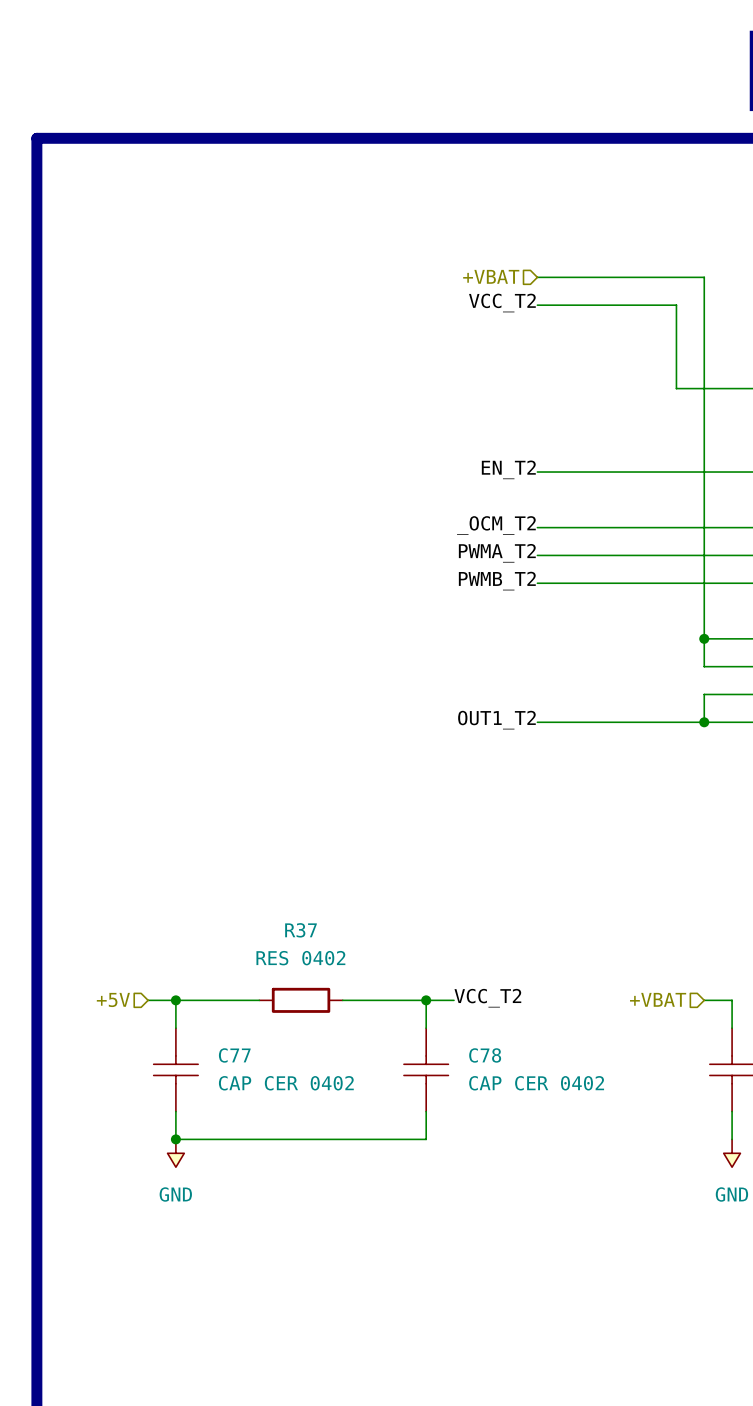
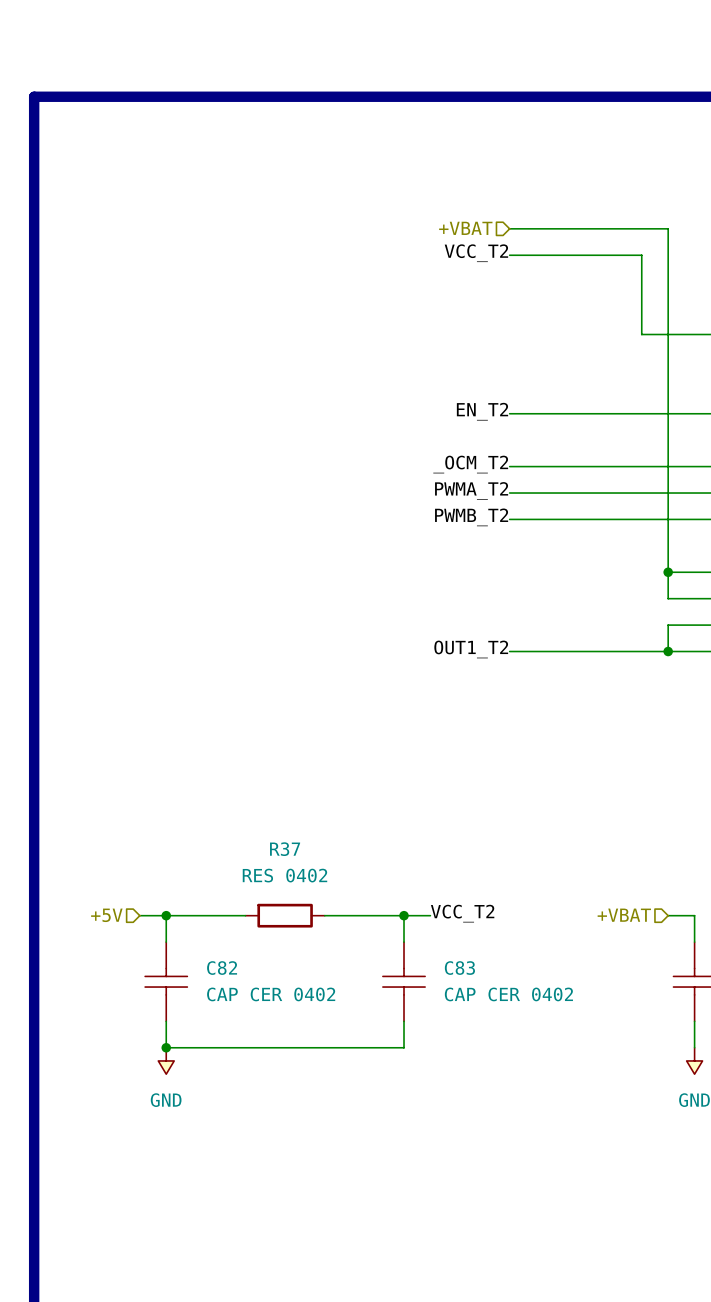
C77 name: C77 (234, 1055) -> C82 (222, 968)
C78 name: C78 (485, 1055) -> C83 (459, 968)

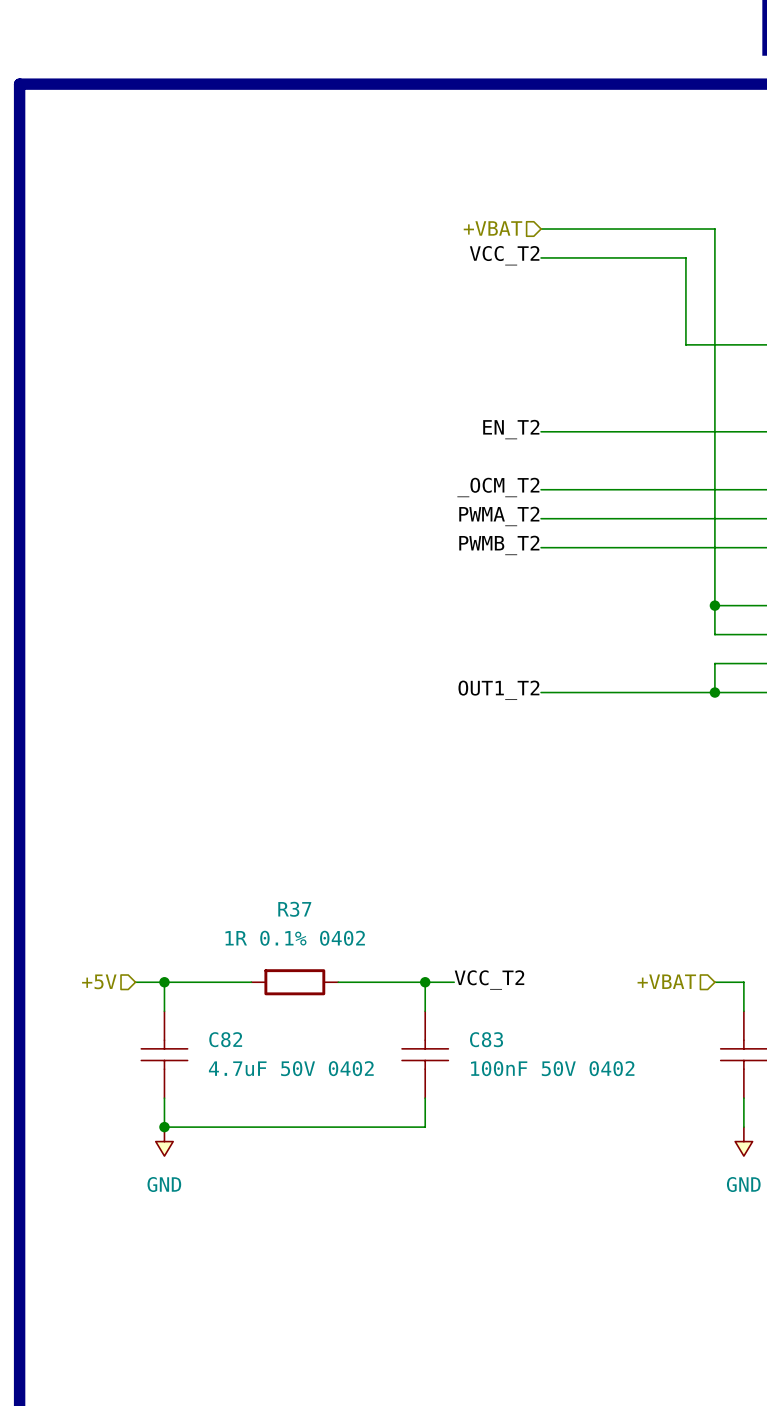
R37 value: RES 0402 (284, 875) -> 1R 0.1% 0402 (295, 938)
C82 value: CAP CER 0402 (271, 994) -> 4.7uF 50V 0402 (291, 1068)
C83 value: CAP CER 0402 (508, 994) -> 100nF 50V 0402 (552, 1068)

